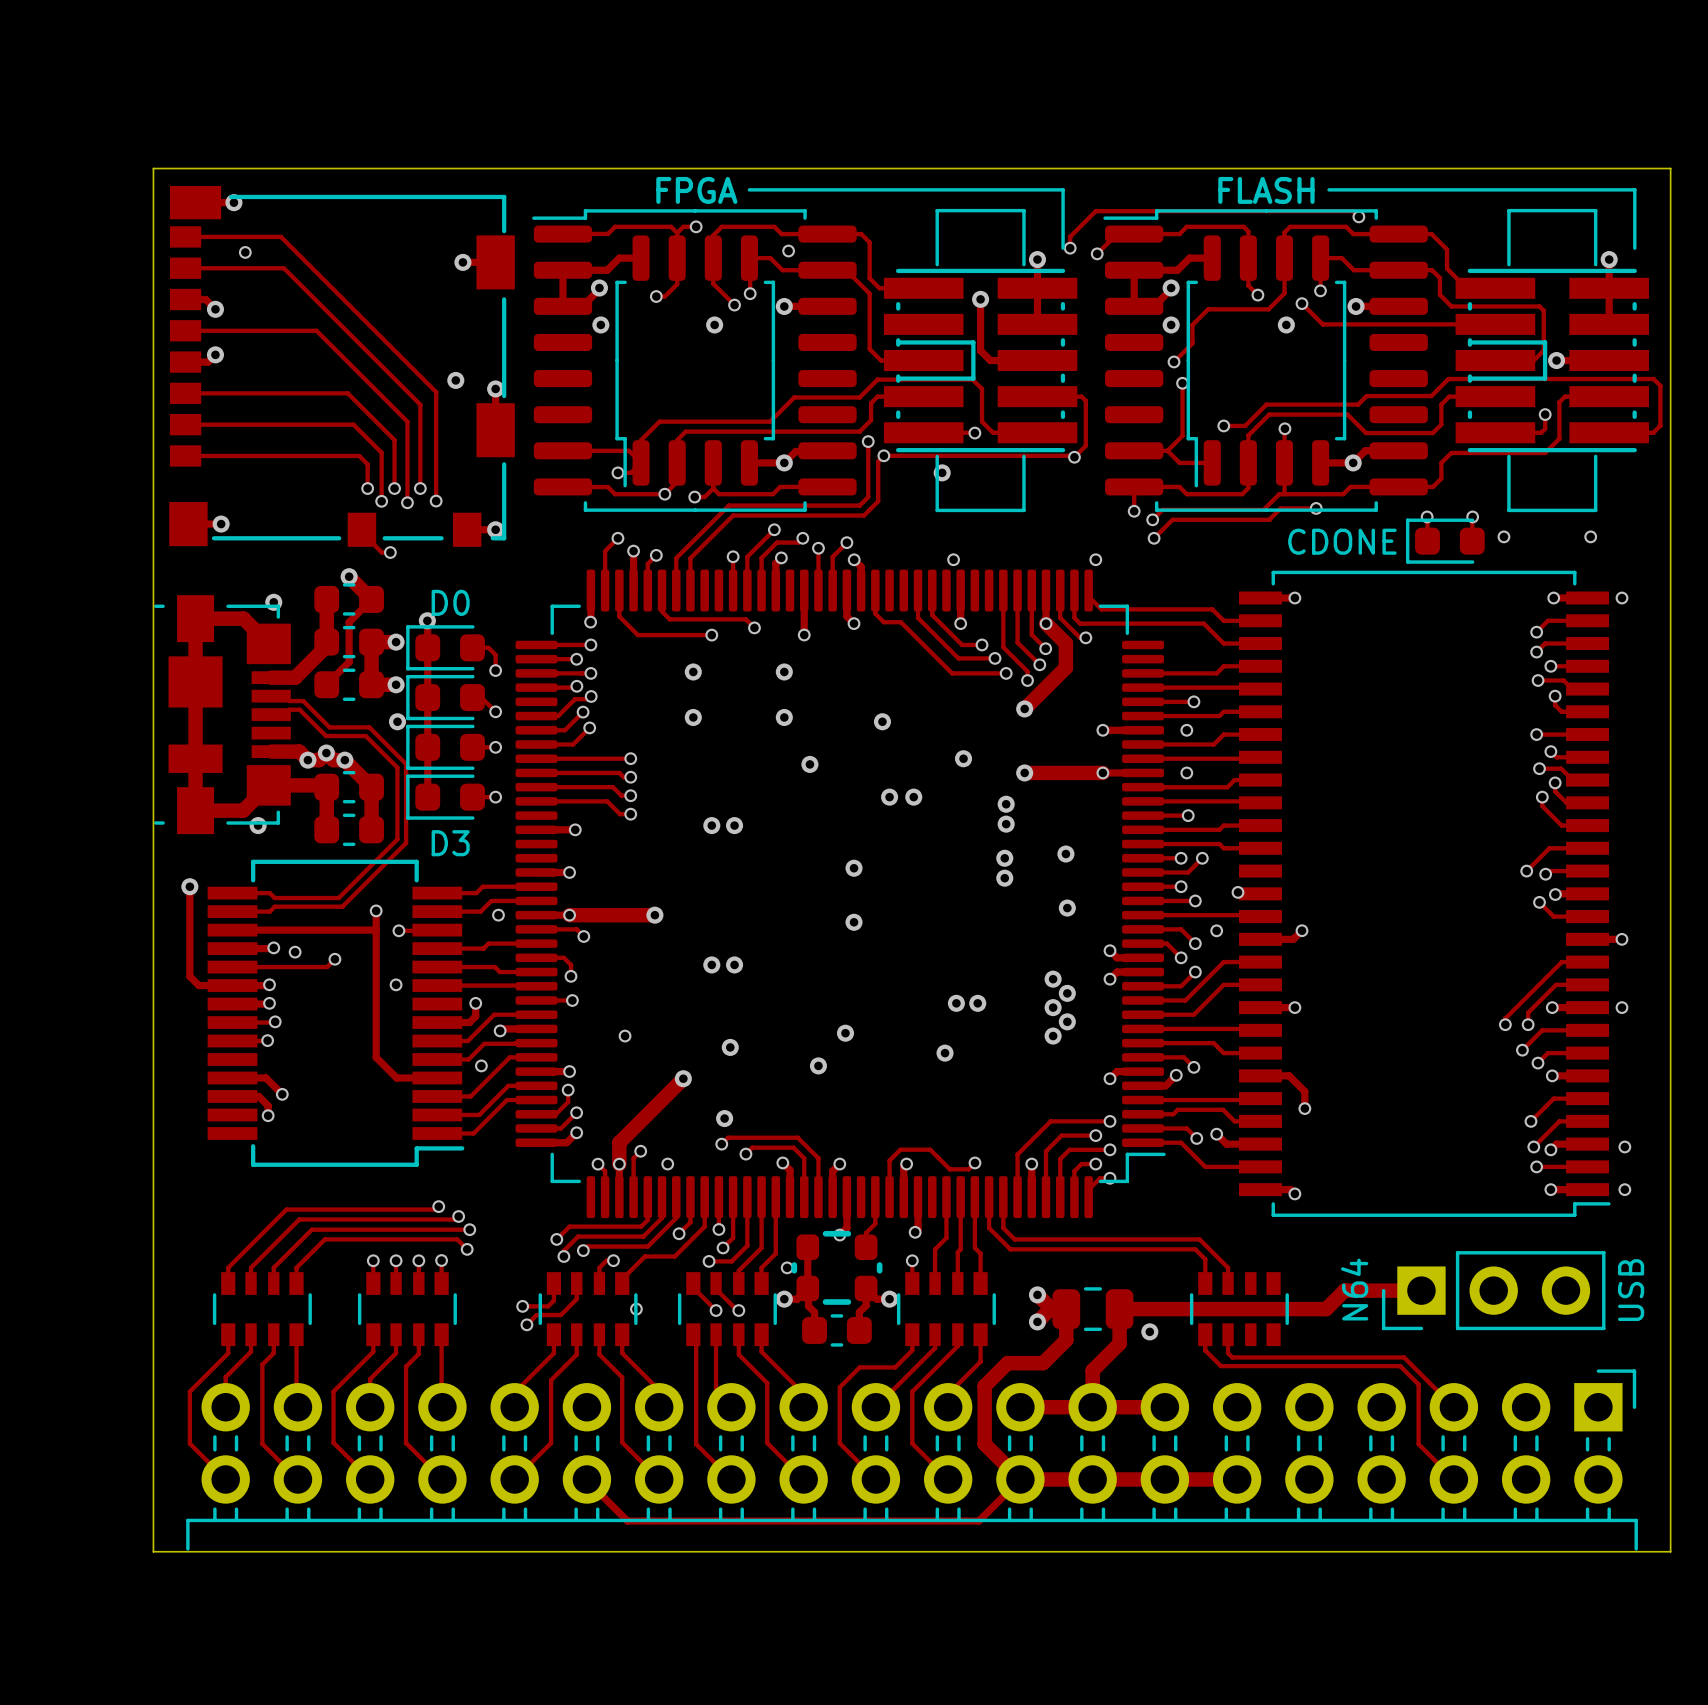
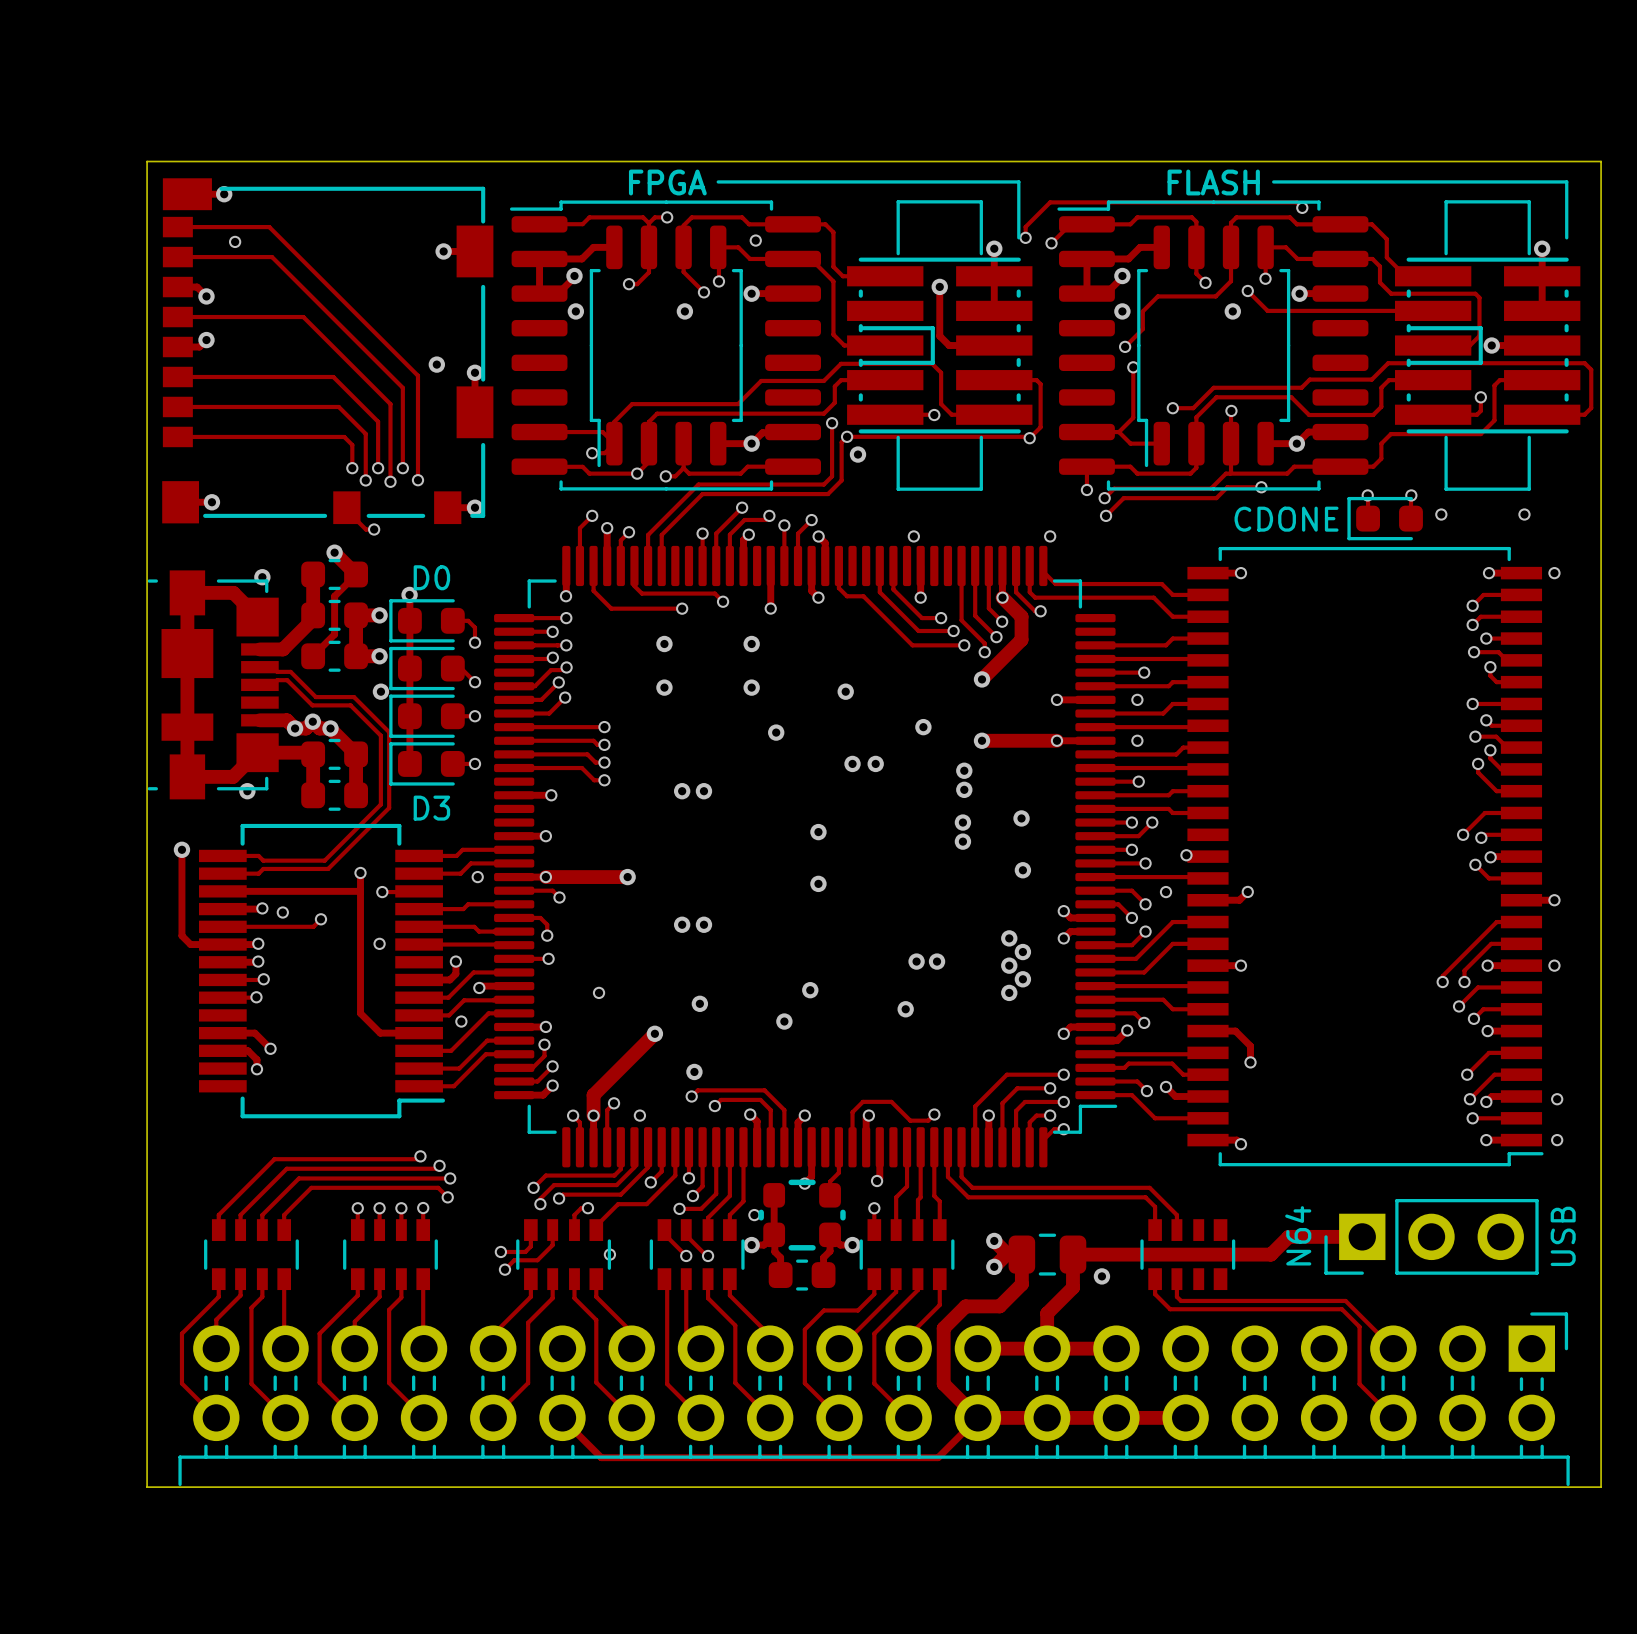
via position: (942, 472) -> (857, 454)

